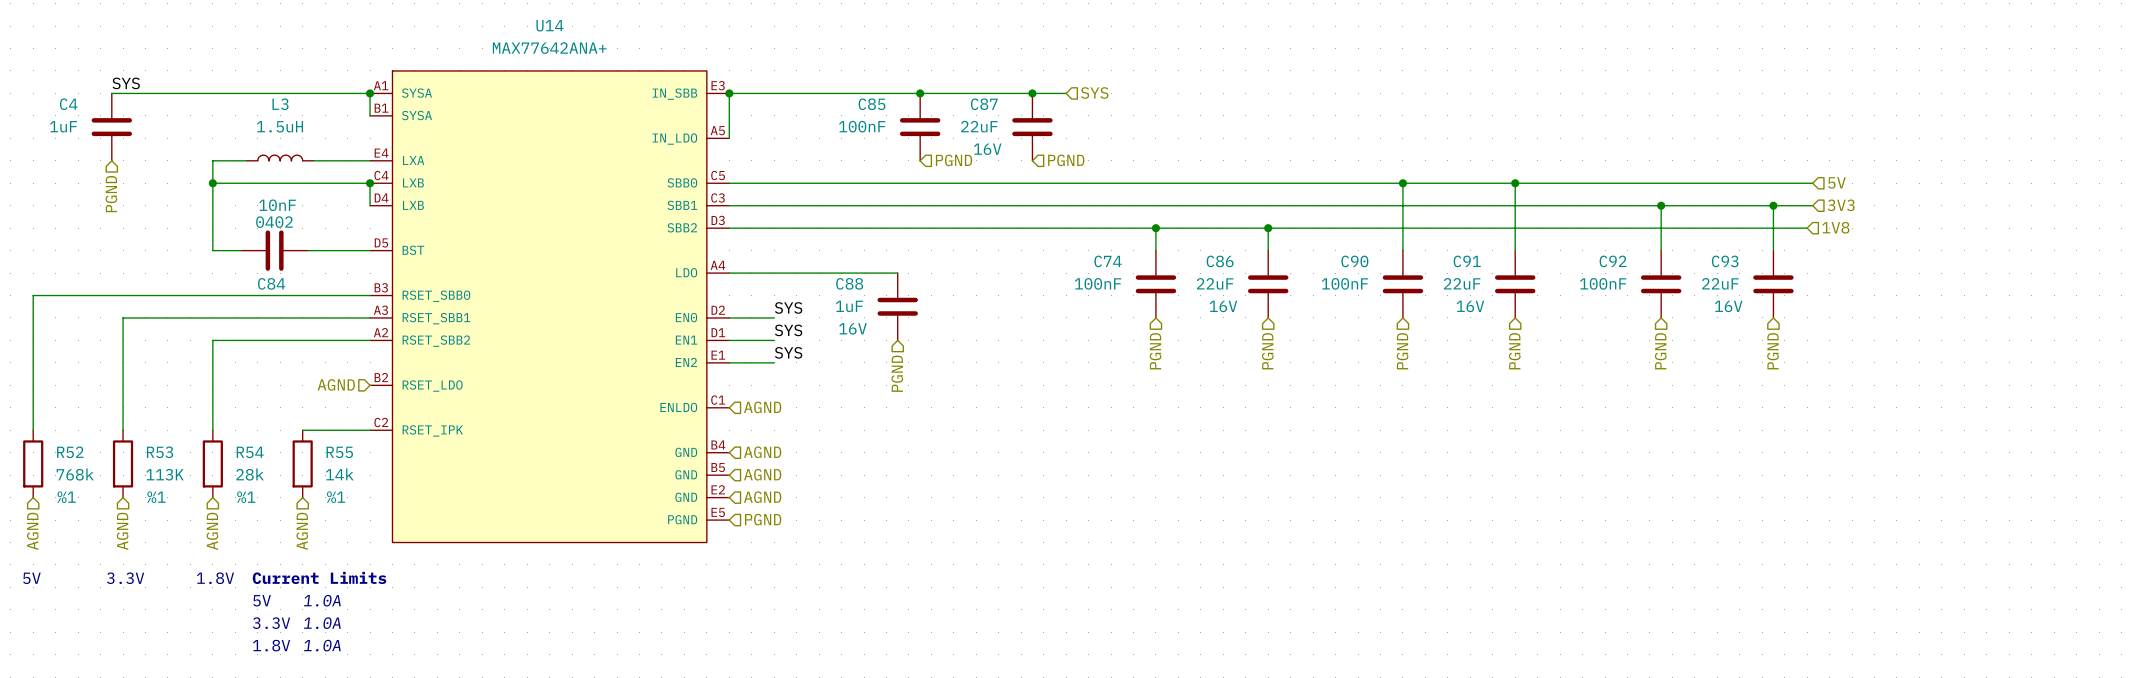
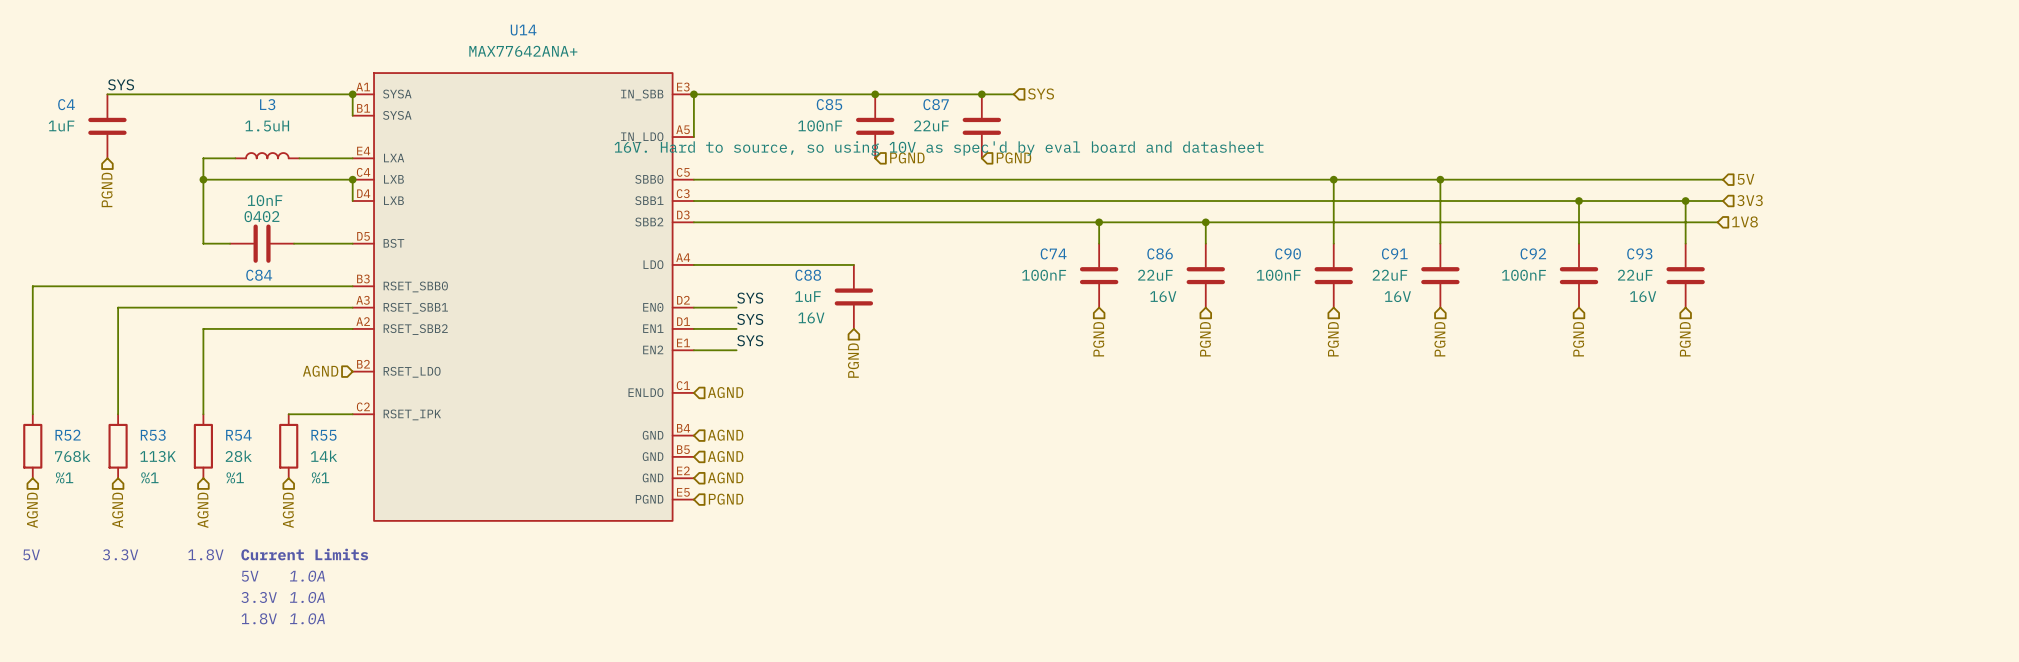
C87 text: 16V (987, 149) -> 16V. Hard to source, so using 10V as spec'd by eval board and datasheet (939, 148)

